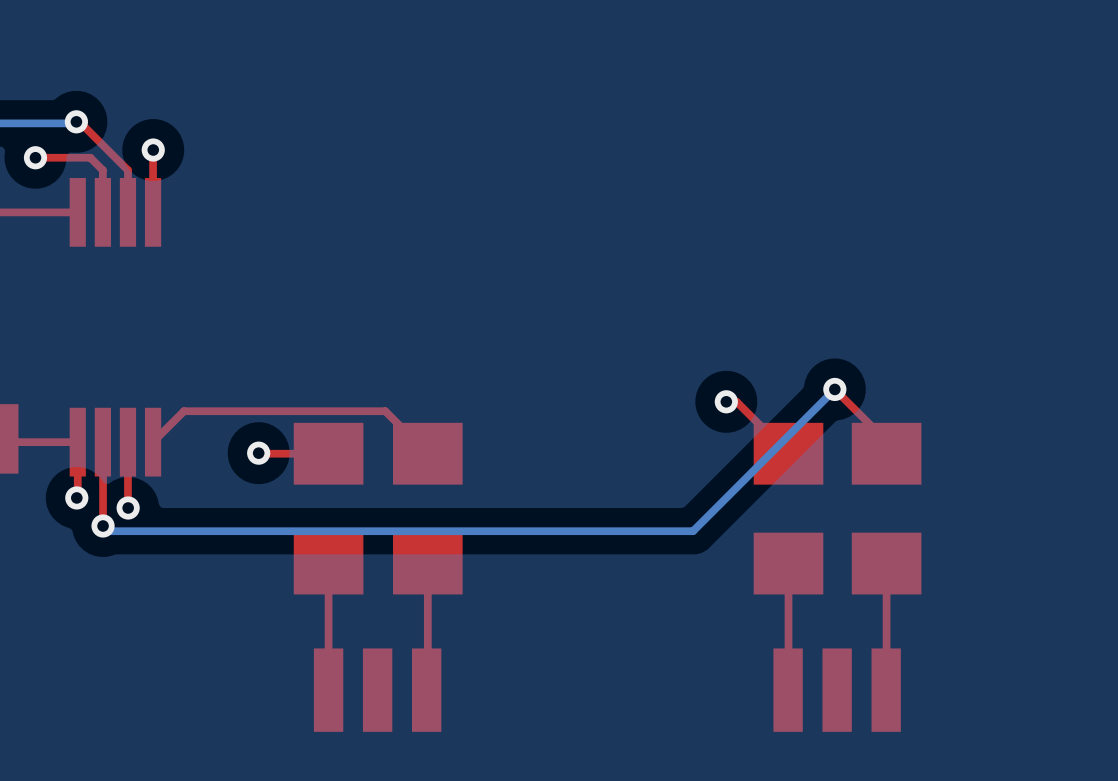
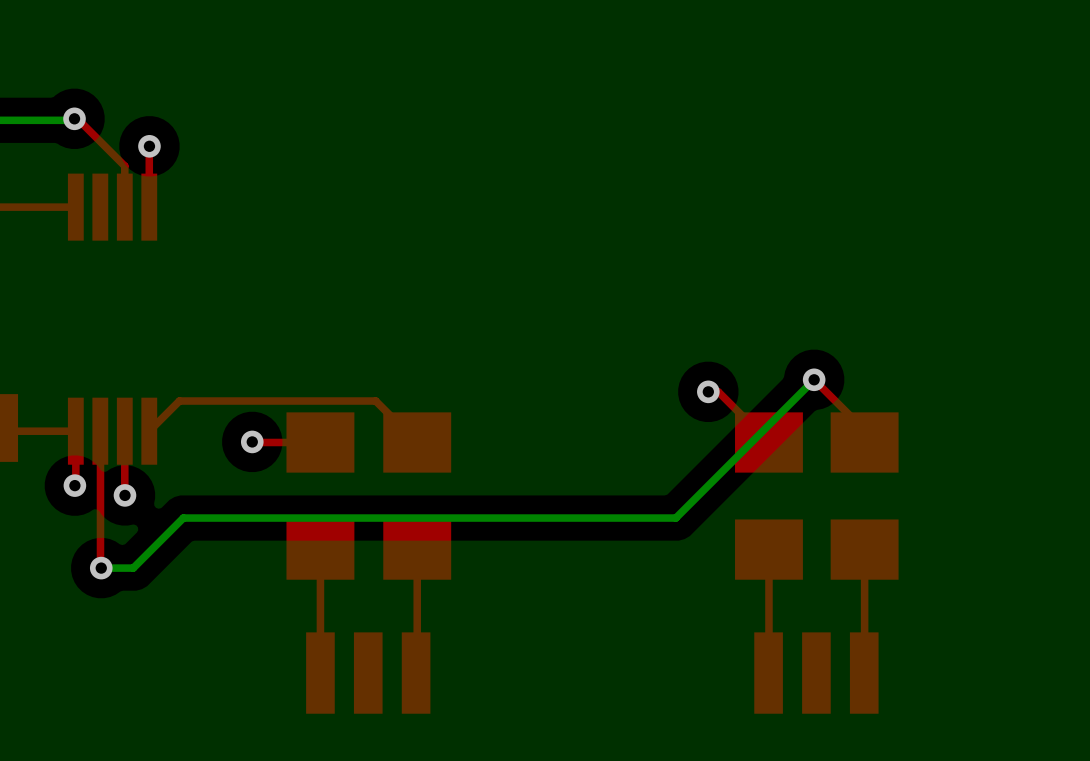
top track: (35, 157) (90, 157) (102, 170) (102, 212) -> none
via: (35, 157) -> none
top track: none -> (100, 512) (101, 568)
bottom track: (103, 525) (108, 531) (188, 531) -> (101, 568) (133, 568) (183, 518)
via position: (103, 525) -> (101, 568)

